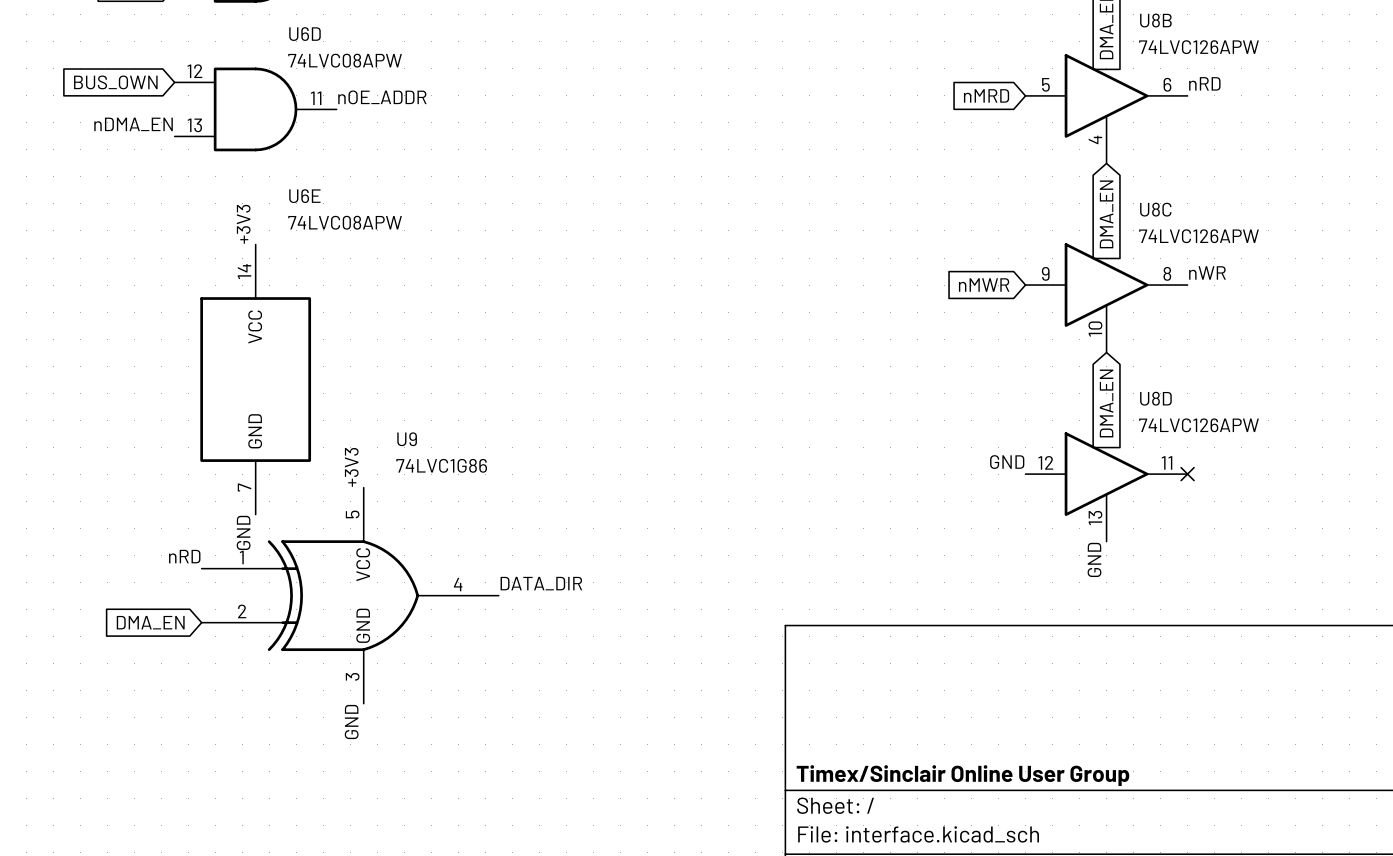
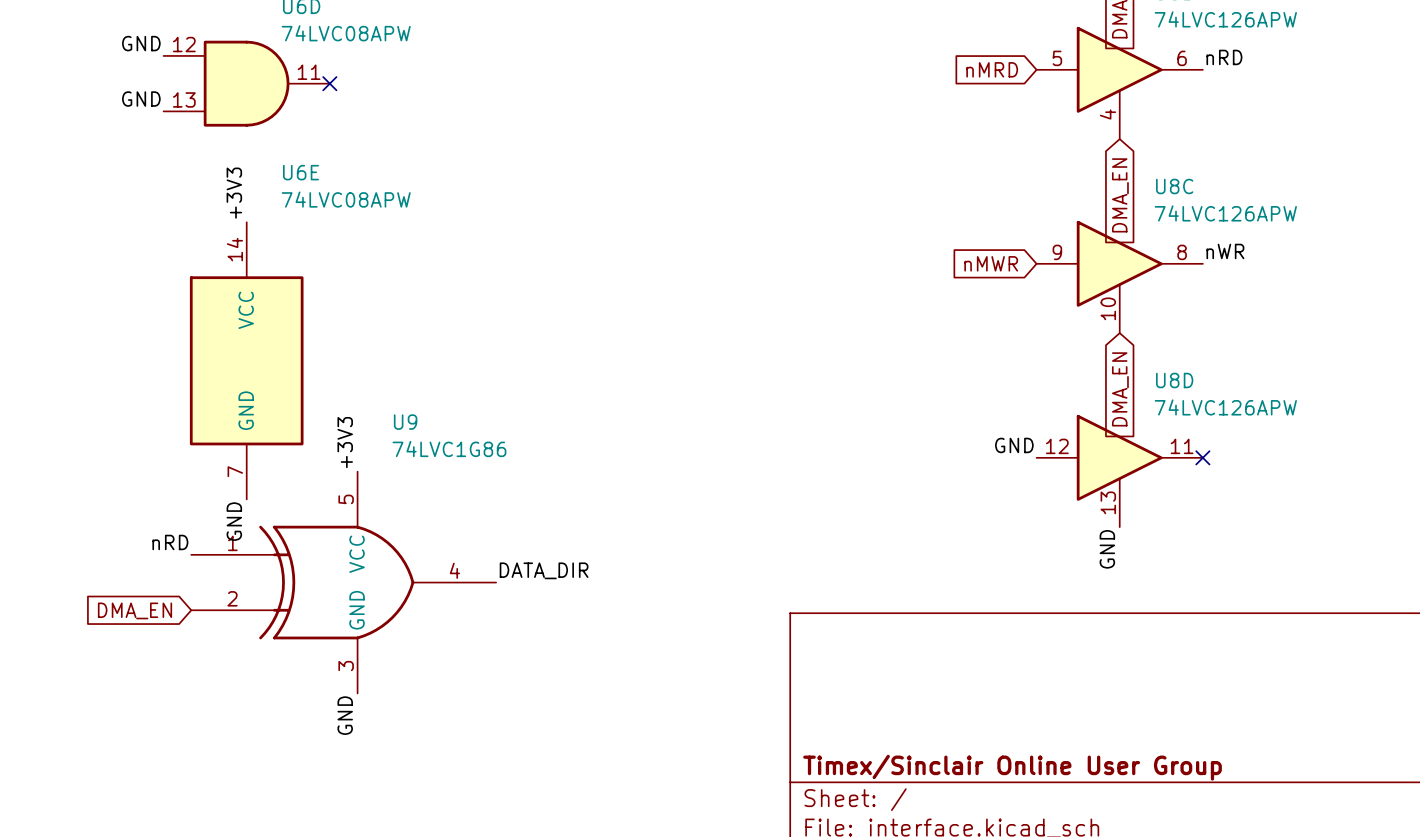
label: none -> GND (141, 43)
global label: BUS_OWN (115, 82) -> none
label: nOE_ADDR (382, 97) -> none
no-connect mark: none -> (329, 83)
label: nDMA_EN (133, 124) -> GND (141, 99)

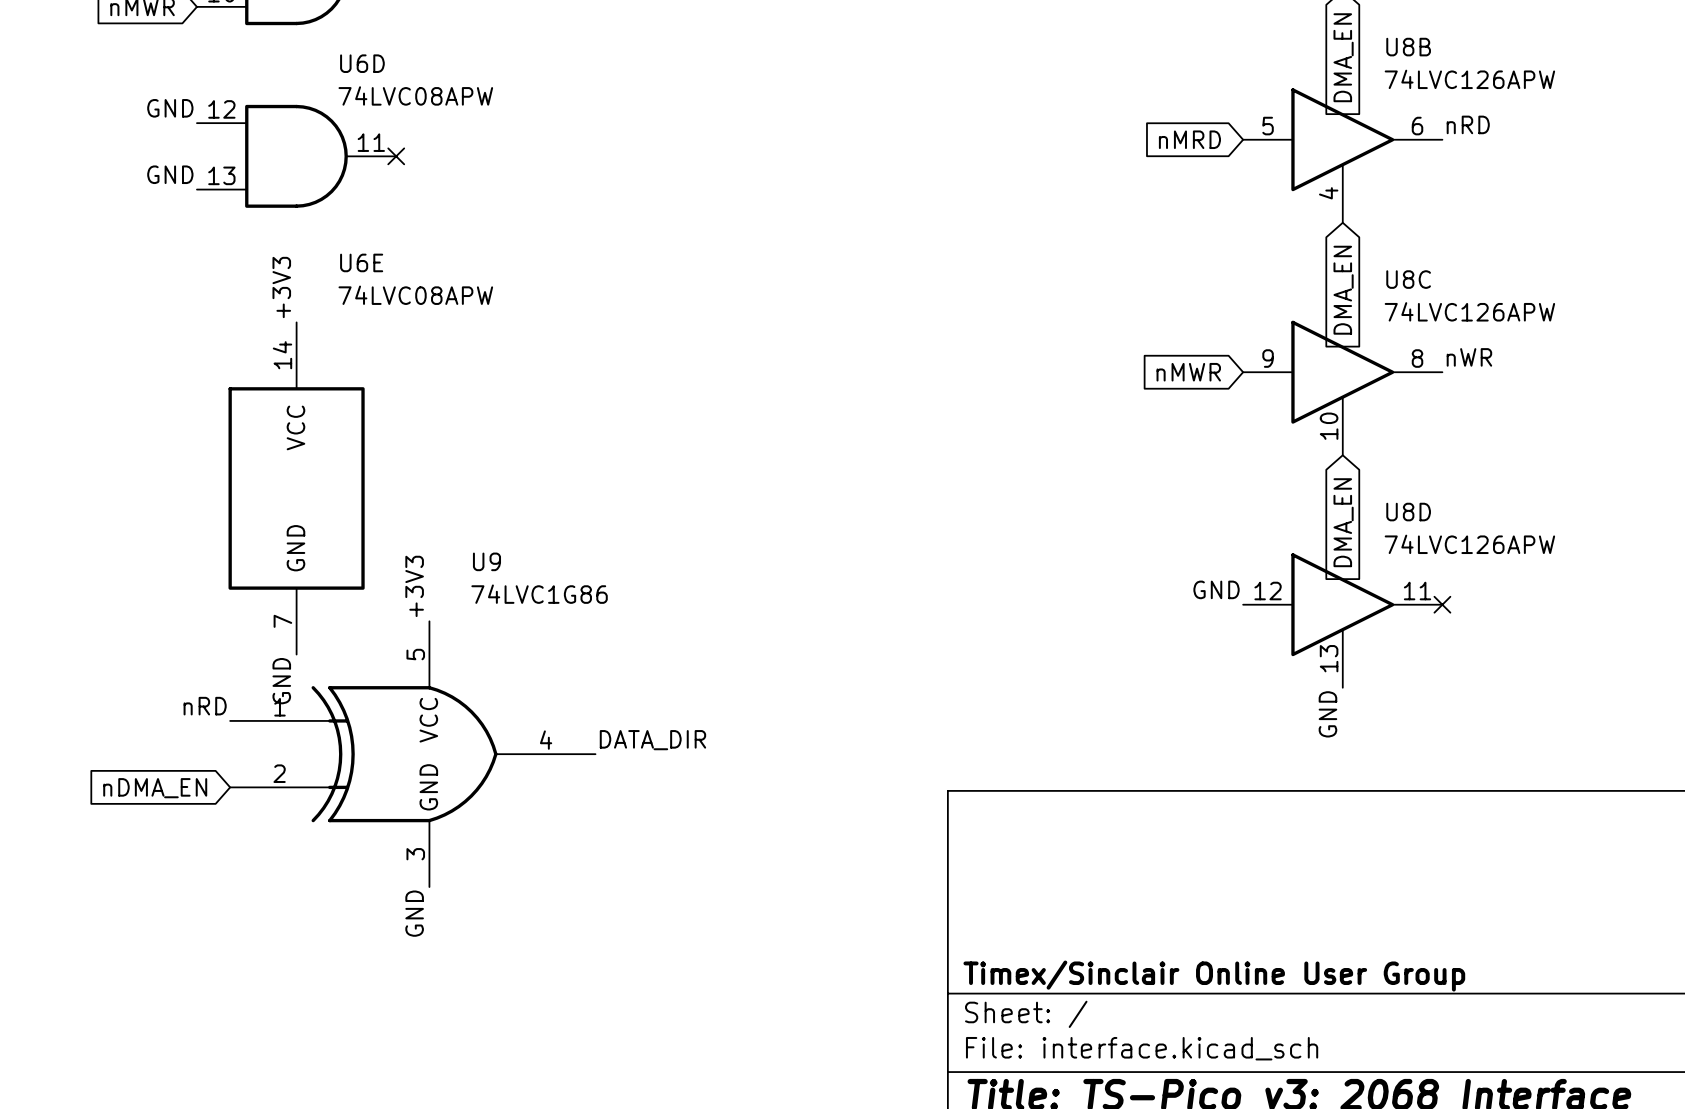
global label: DMA_EN (135, 610) -> nDMA_EN (155, 788)

